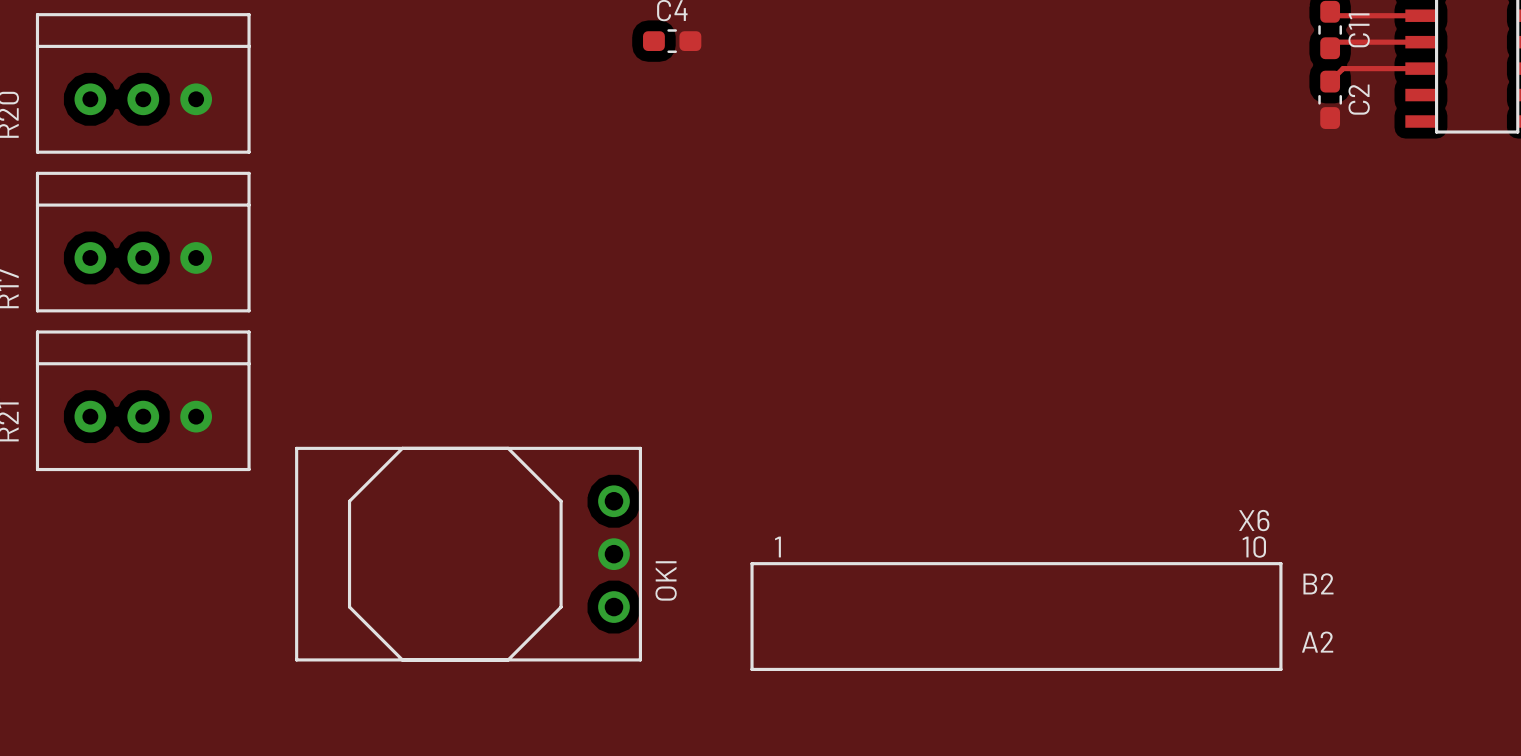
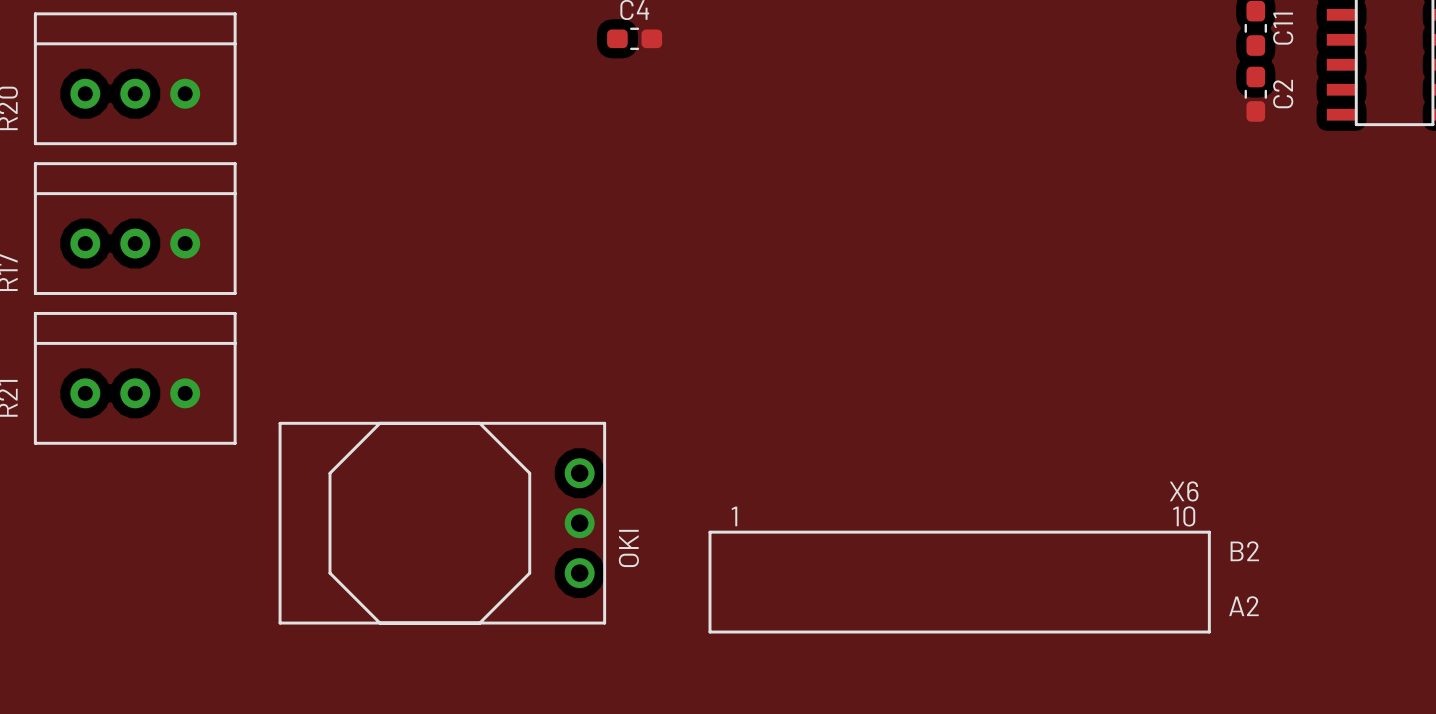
track: (1330, 11) (1334, 15) (1420, 15) -> none
track: (1420, 42) (1336, 42) (1330, 48) -> none
track: (1420, 68) (1343, 68) (1330, 81) -> none

